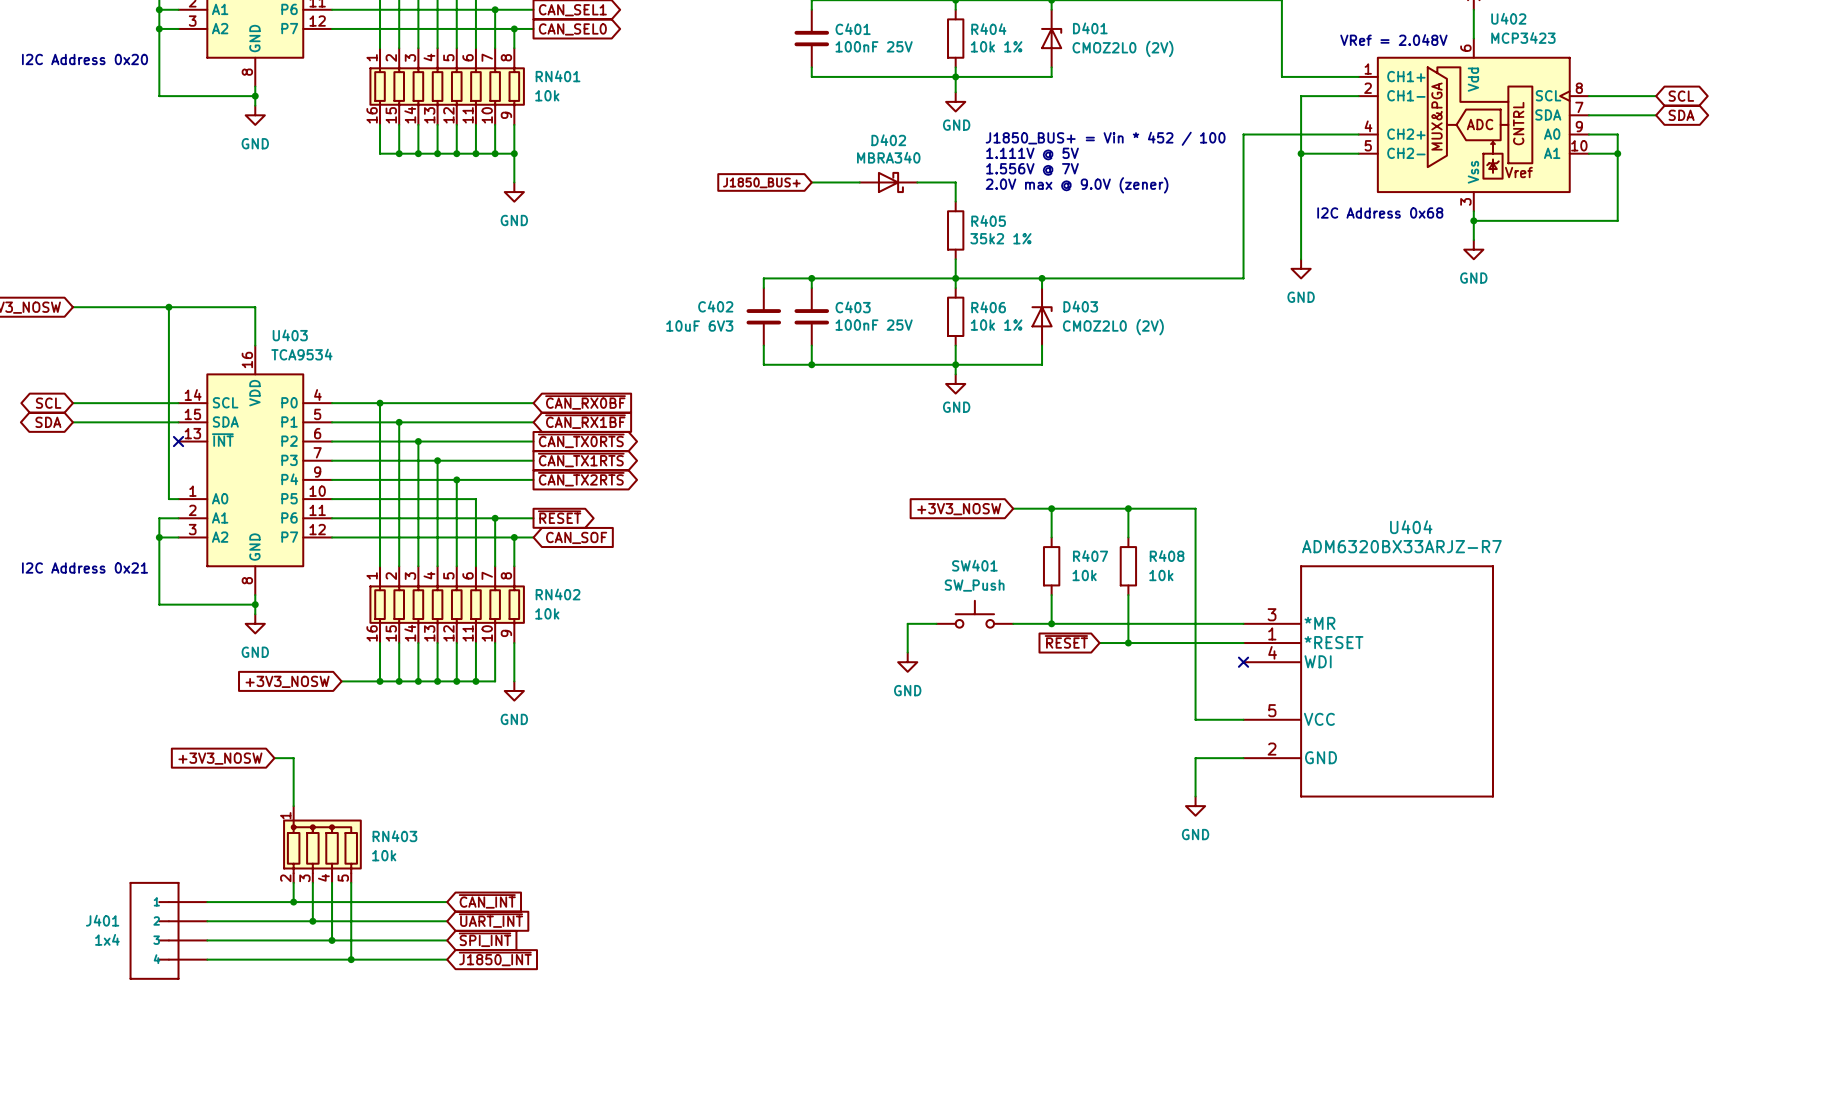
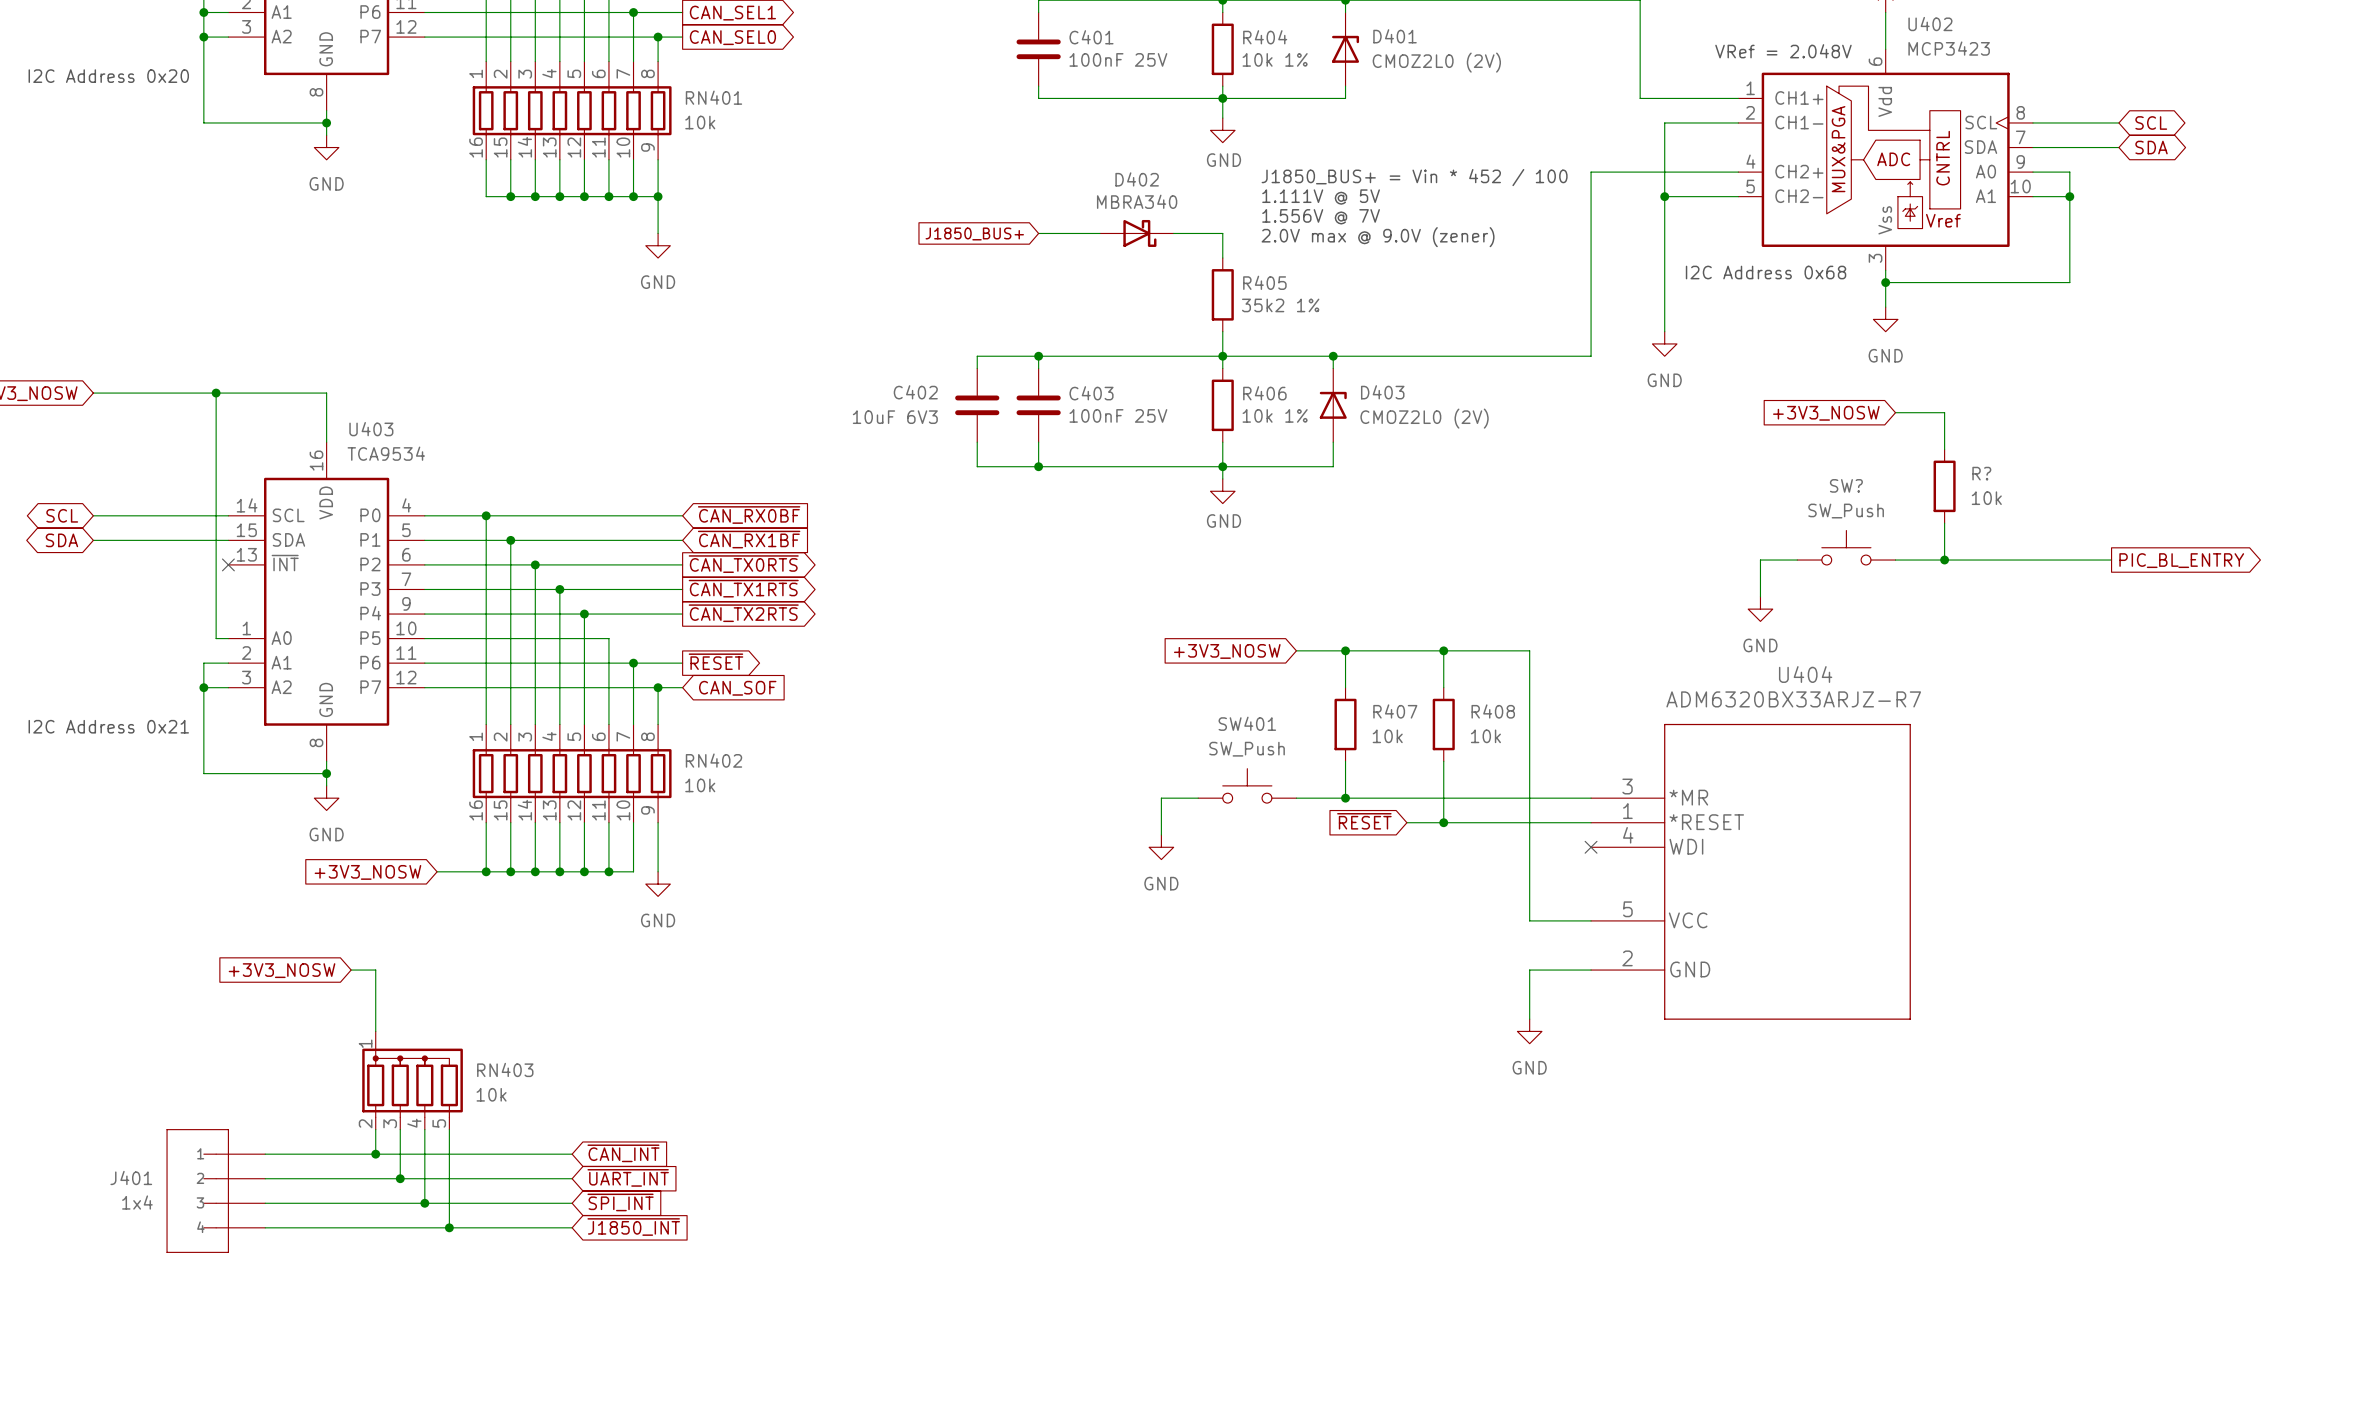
wire: none -> (1895, 412) (1944, 412) (1944, 449)
global label: none -> +3V3_NOSW (1826, 413)
R?: none -> 10k (1944, 486)
wire: none -> (1944, 523) (1944, 560)
SW?: none -> SW_Push (1846, 547)
wire: none -> (1797, 560) (1760, 560) (1760, 596)
wire: none -> (1895, 560) (2111, 560)
junction: none -> (1944, 560)
global label: none -> PIC_BL_ENTRY (2181, 560)
power symbol: none -> GND (1760, 609)

